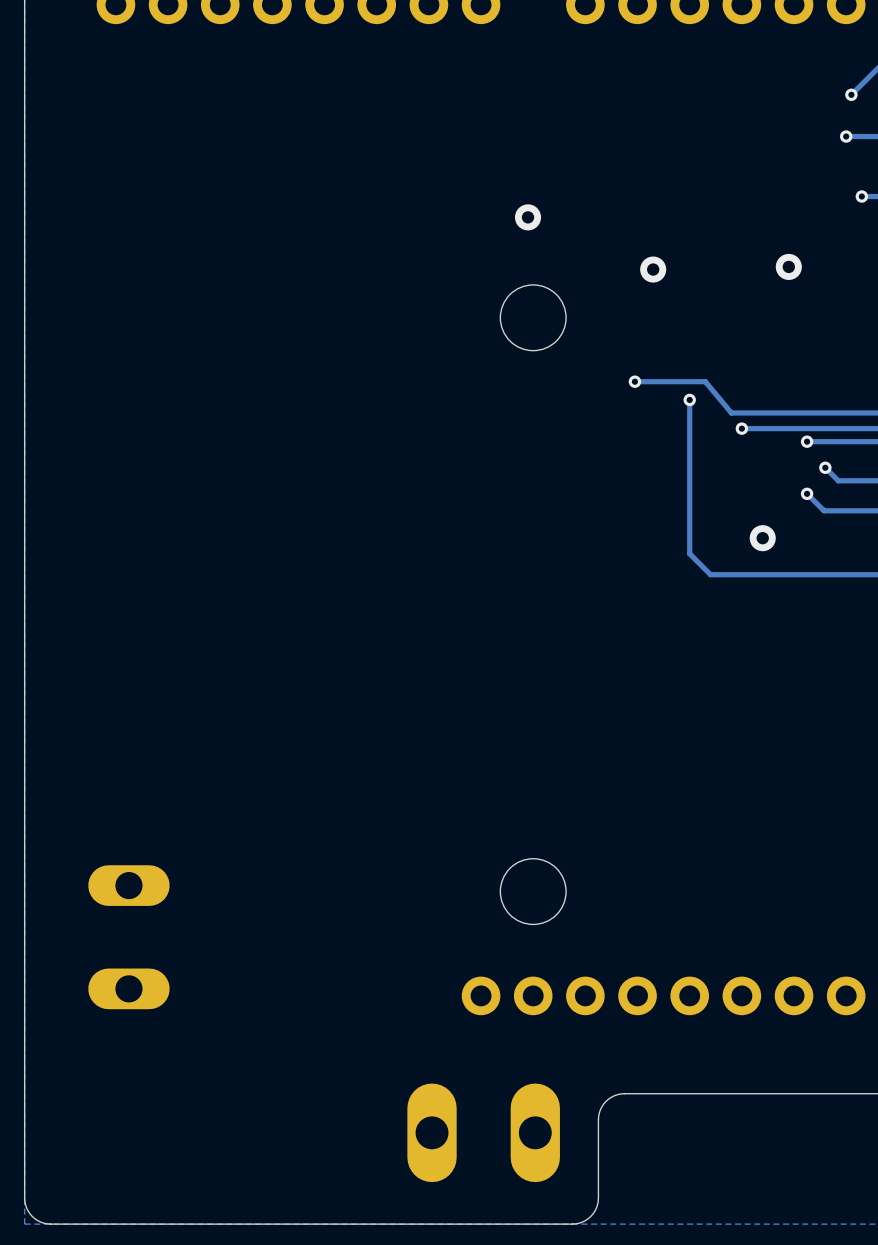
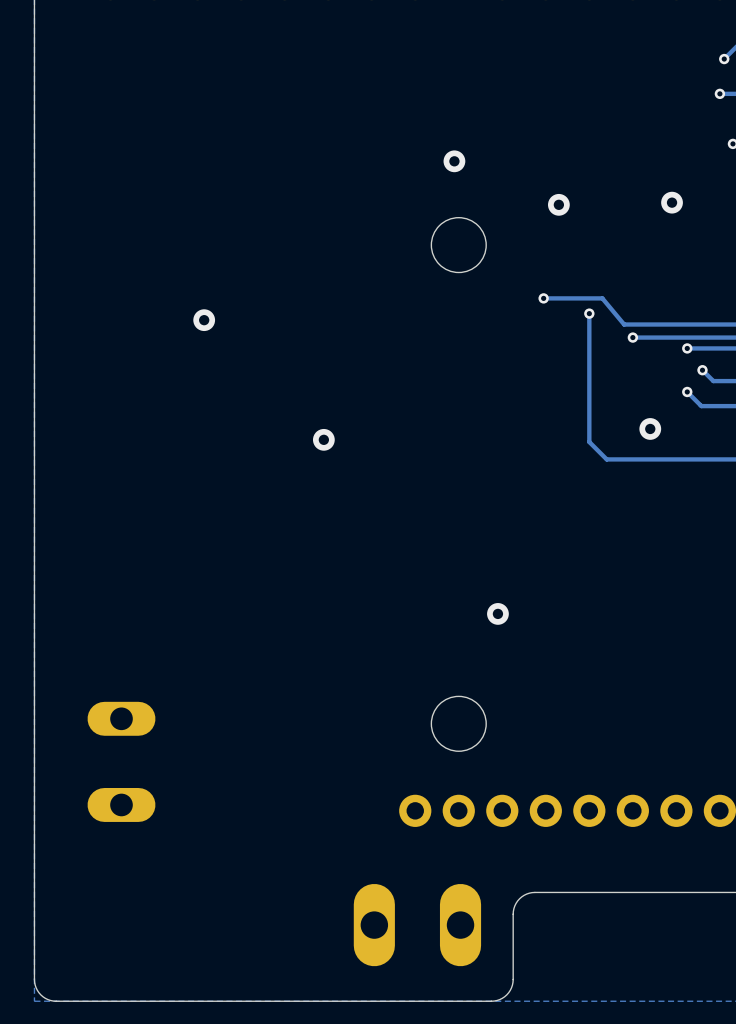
via: none -> (204, 320)
via: none -> (323, 439)
via: none -> (497, 613)

